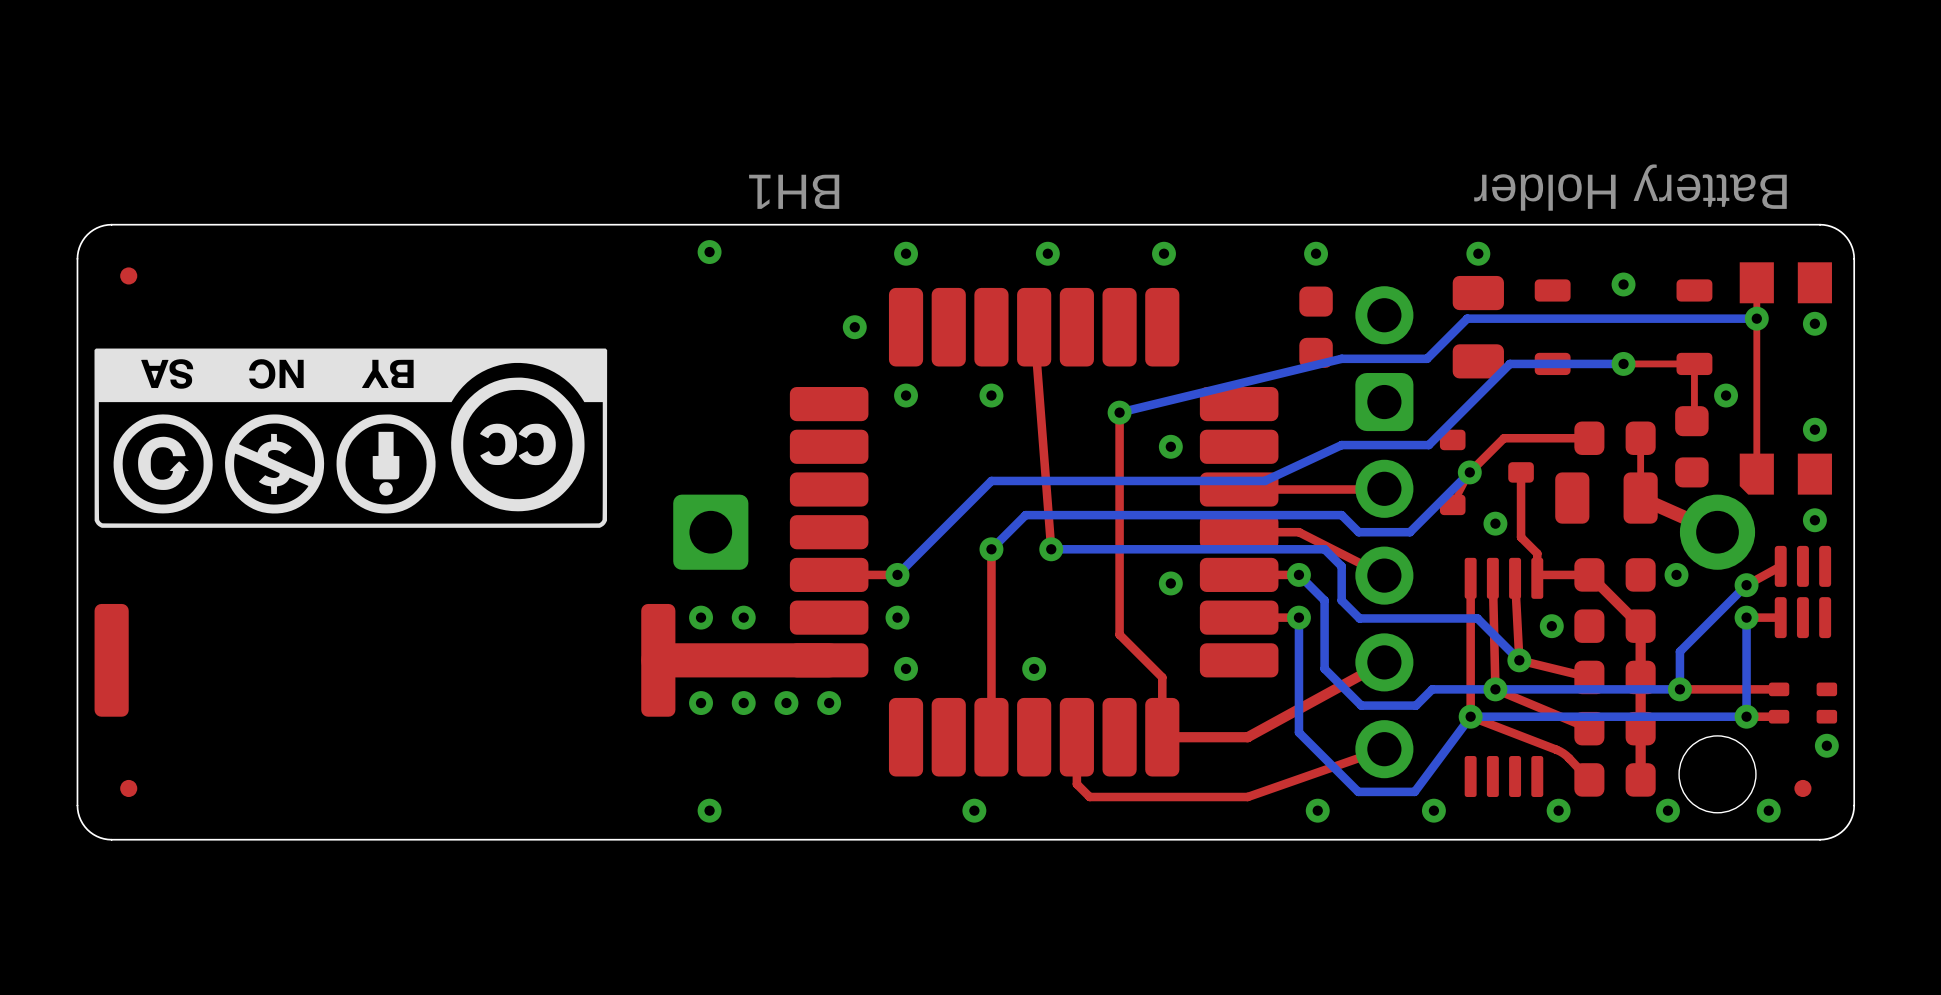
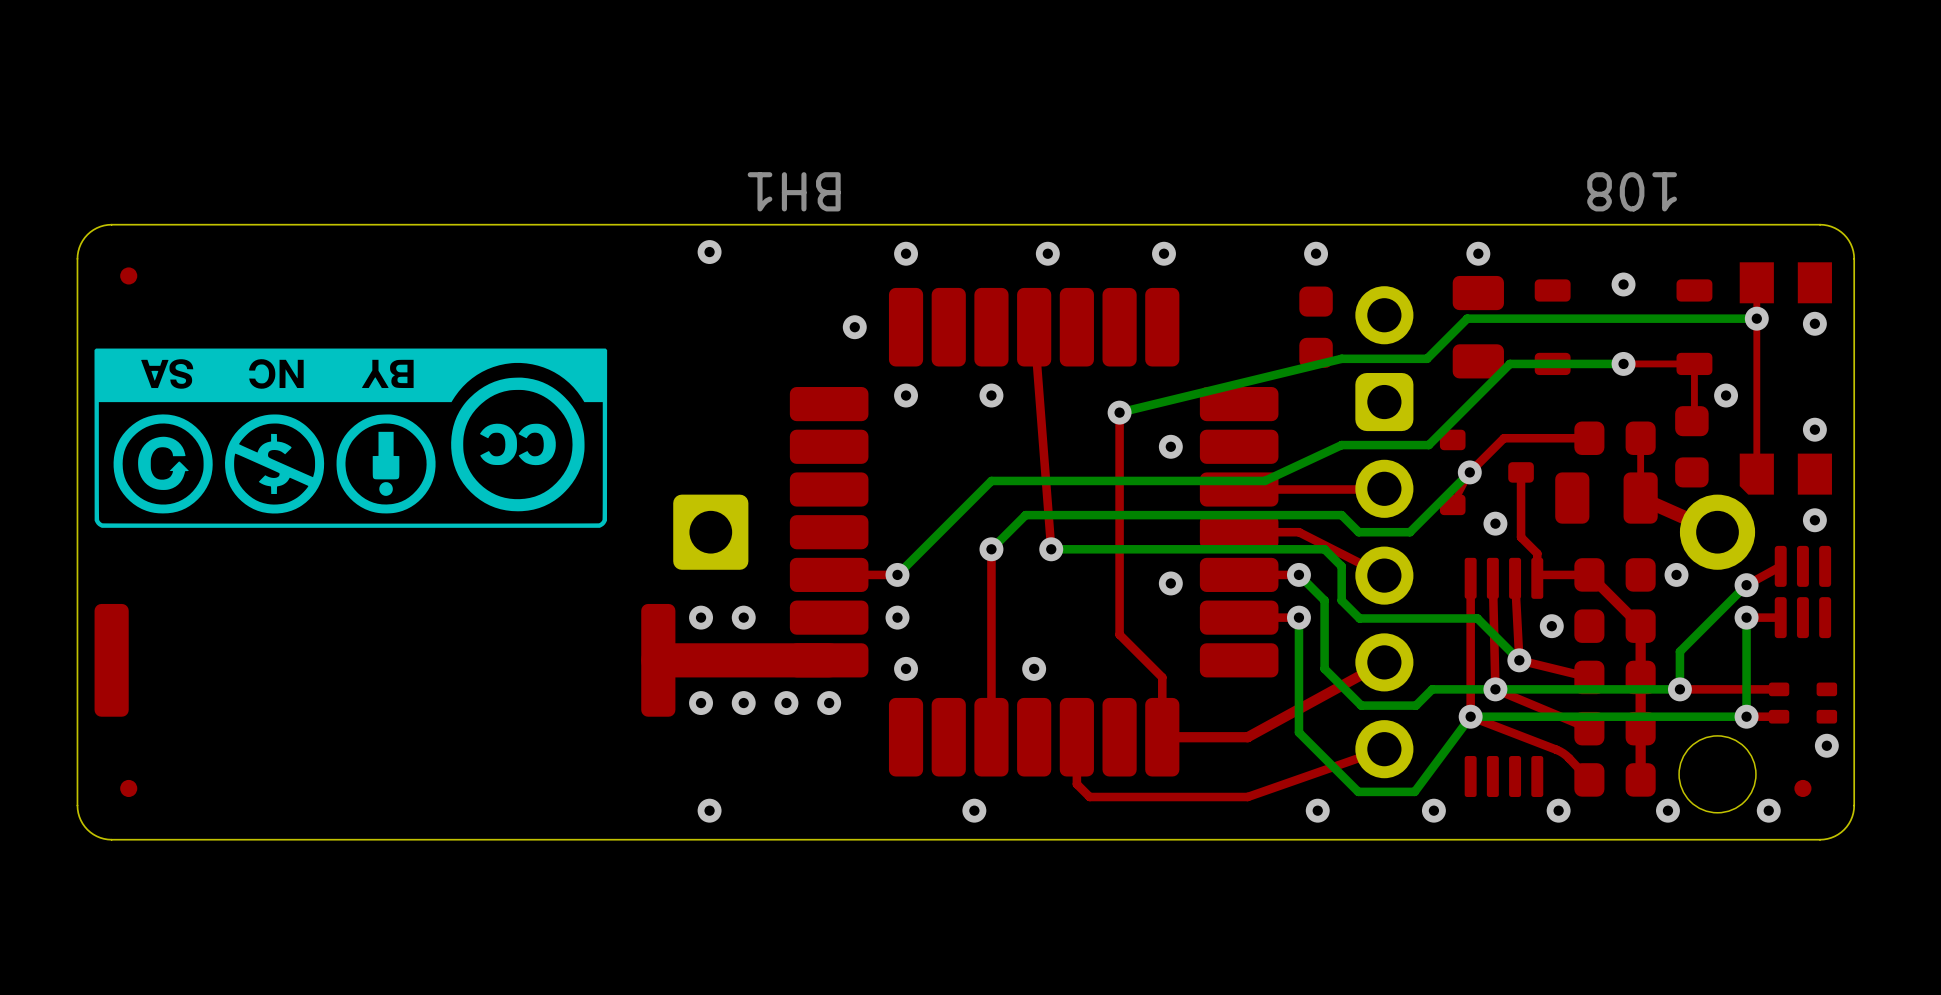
BH1 value: Battery Holder (1630, 187) -> 108 (1632, 191)

